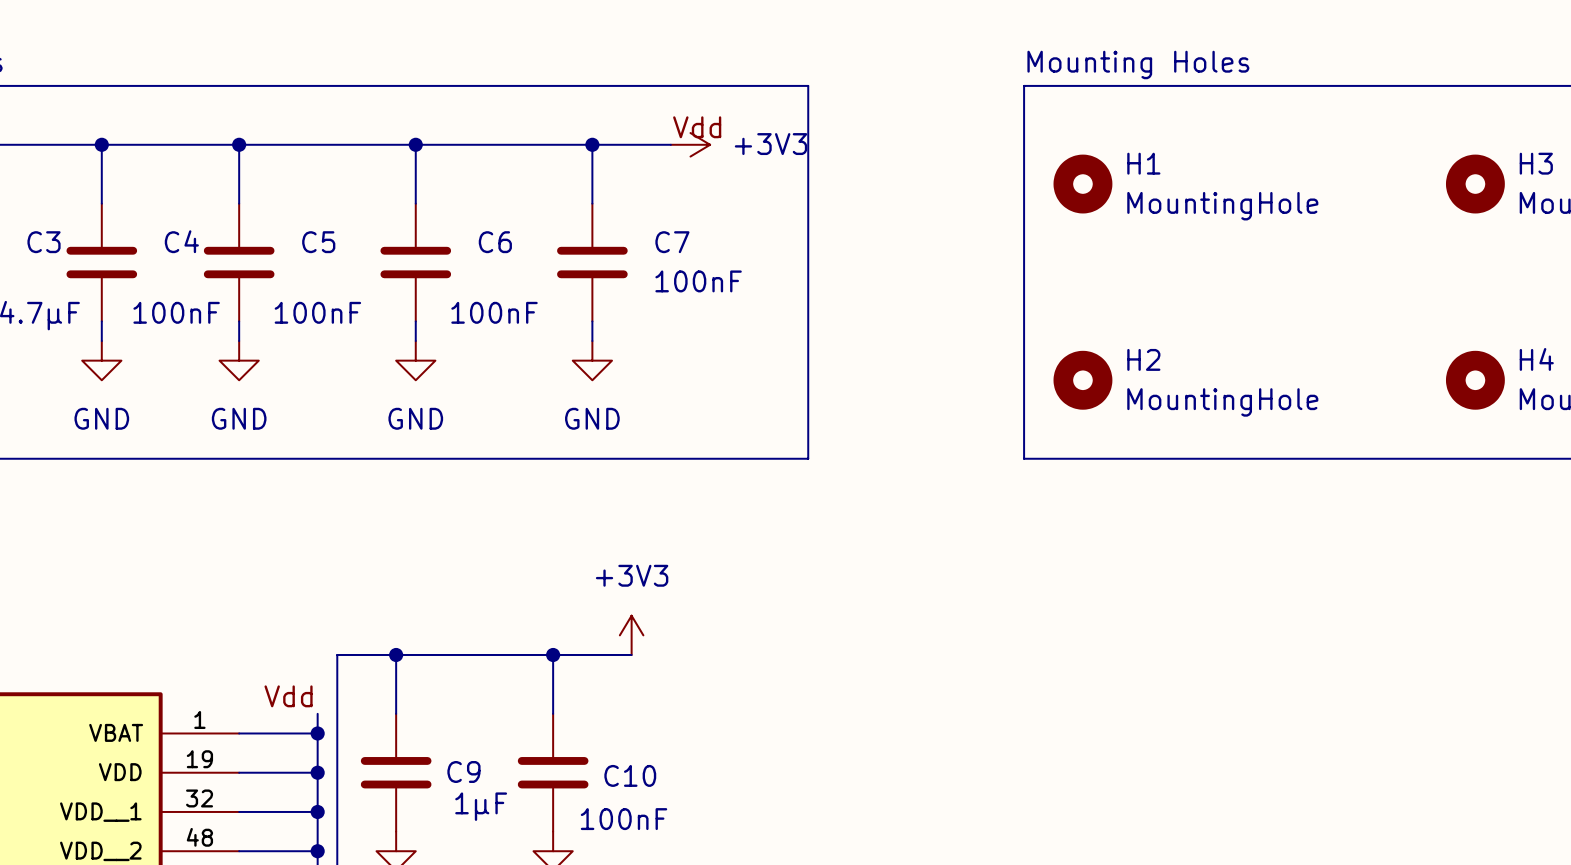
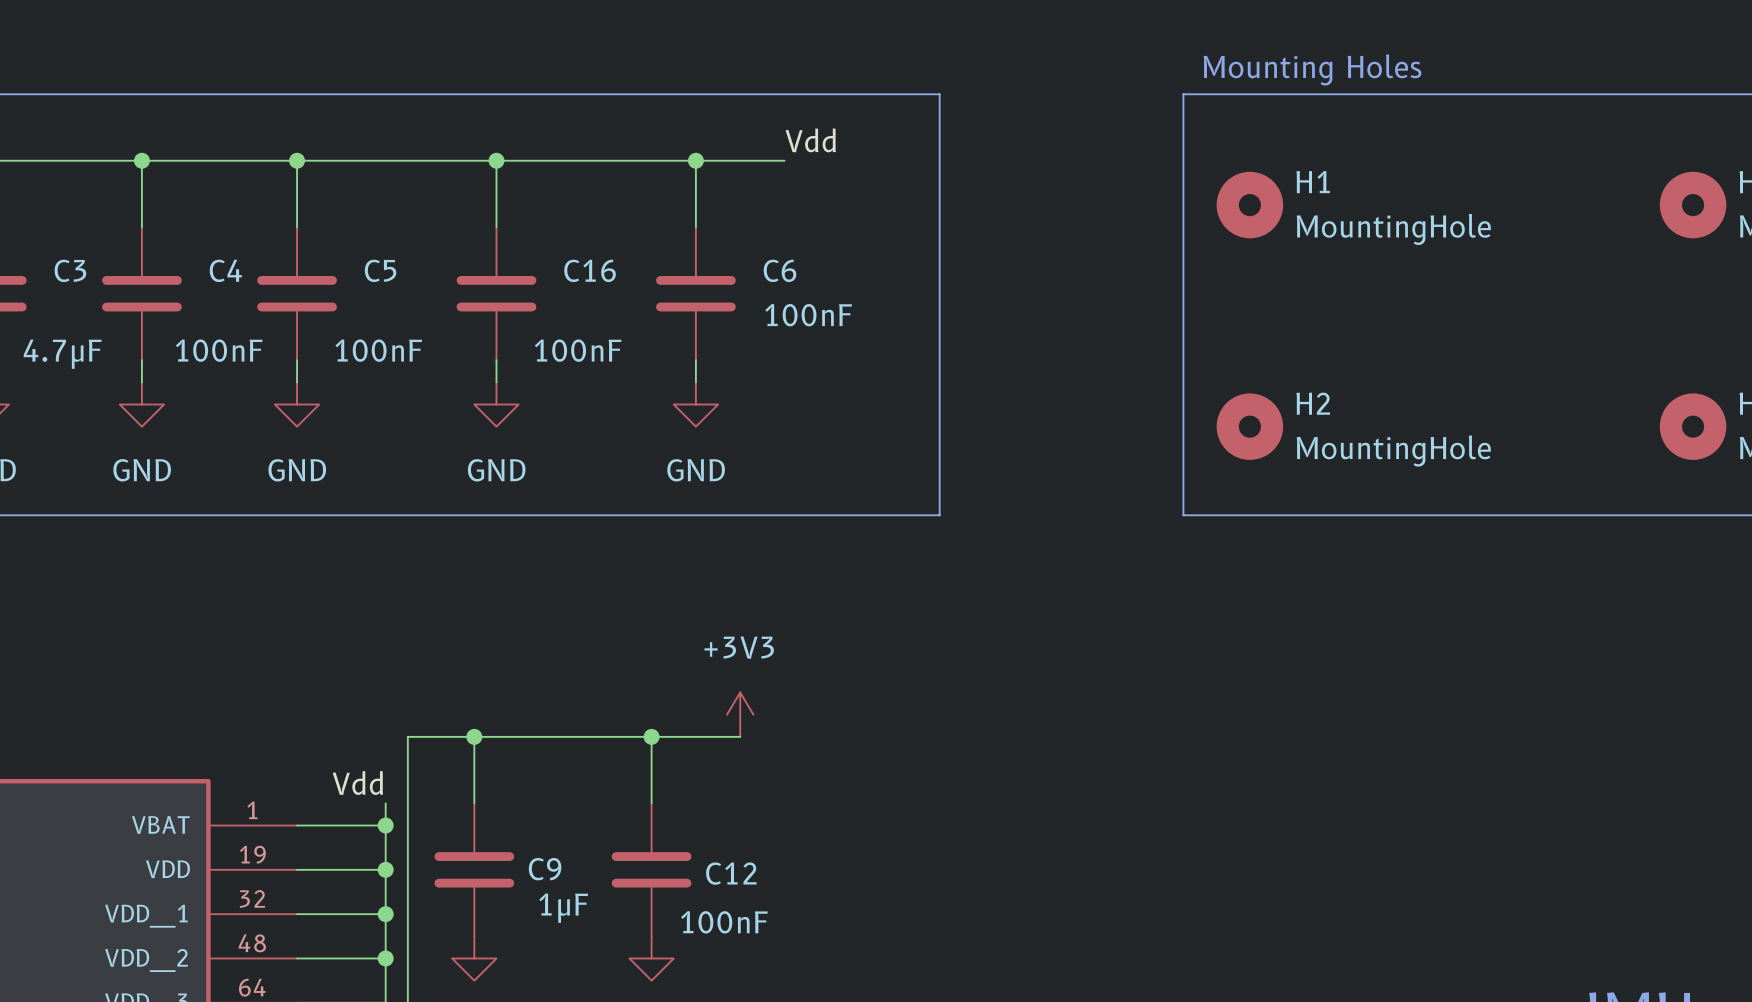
power symbol: +3V3 (690, 144) -> none
C6 name: C6 (495, 242) -> C16 (590, 270)
C7 name: C7 (672, 242) -> C6 (780, 270)
C10 name: C10 (630, 775) -> C12 (731, 873)

